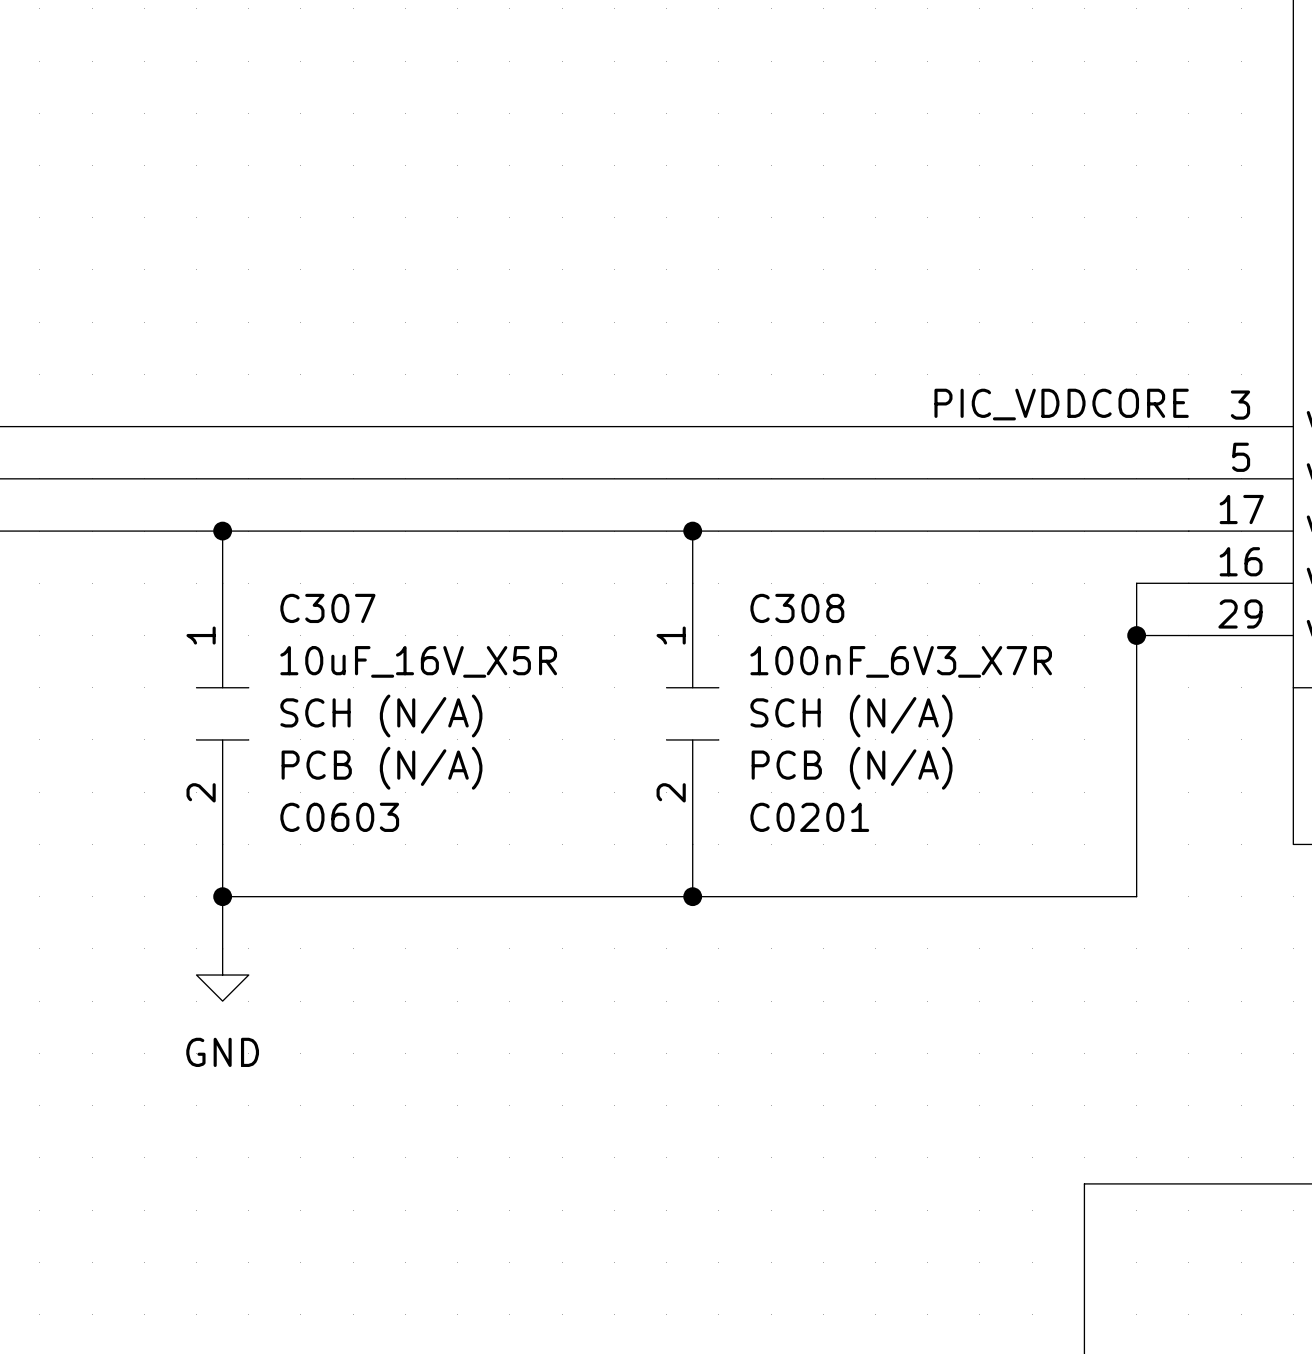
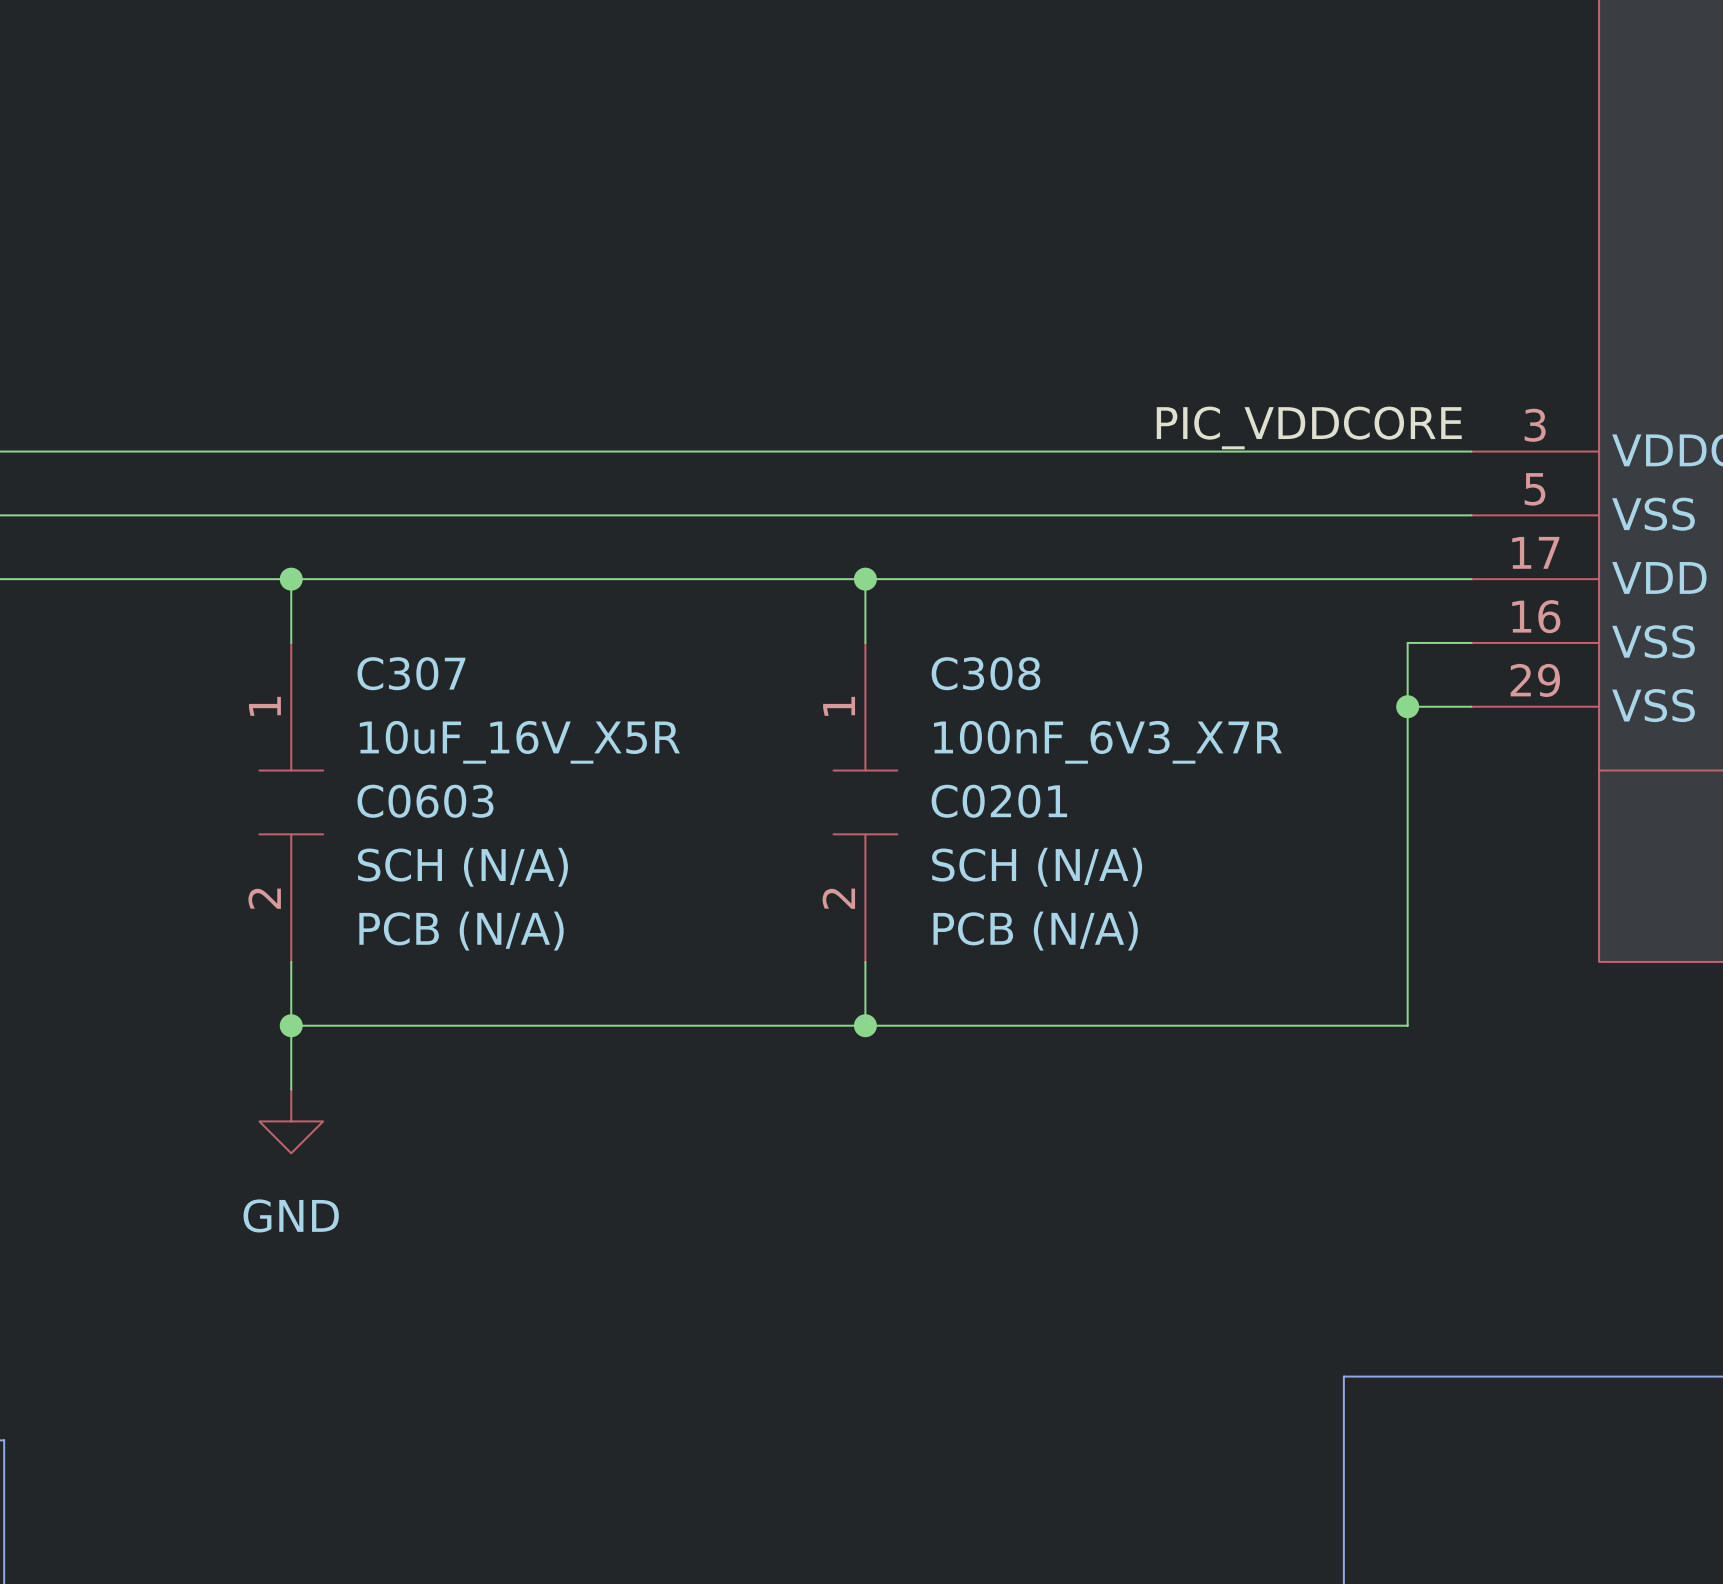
C307 text position: SCH (N/A) (381, 716) -> SCH (N/A) (462, 867)
C308 text position: SCH (N/A) (851, 716) -> SCH (N/A) (1037, 867)
C307 text position: PCB (N/A) (382, 768) -> PCB (N/A) (461, 931)
C308 text position: PCB (N/A) (852, 768) -> PCB (N/A) (1035, 931)
C307 text position: C0603 (339, 817) -> C0603 (425, 801)
C308 text position: C0201 (809, 817) -> C0201 (999, 801)

